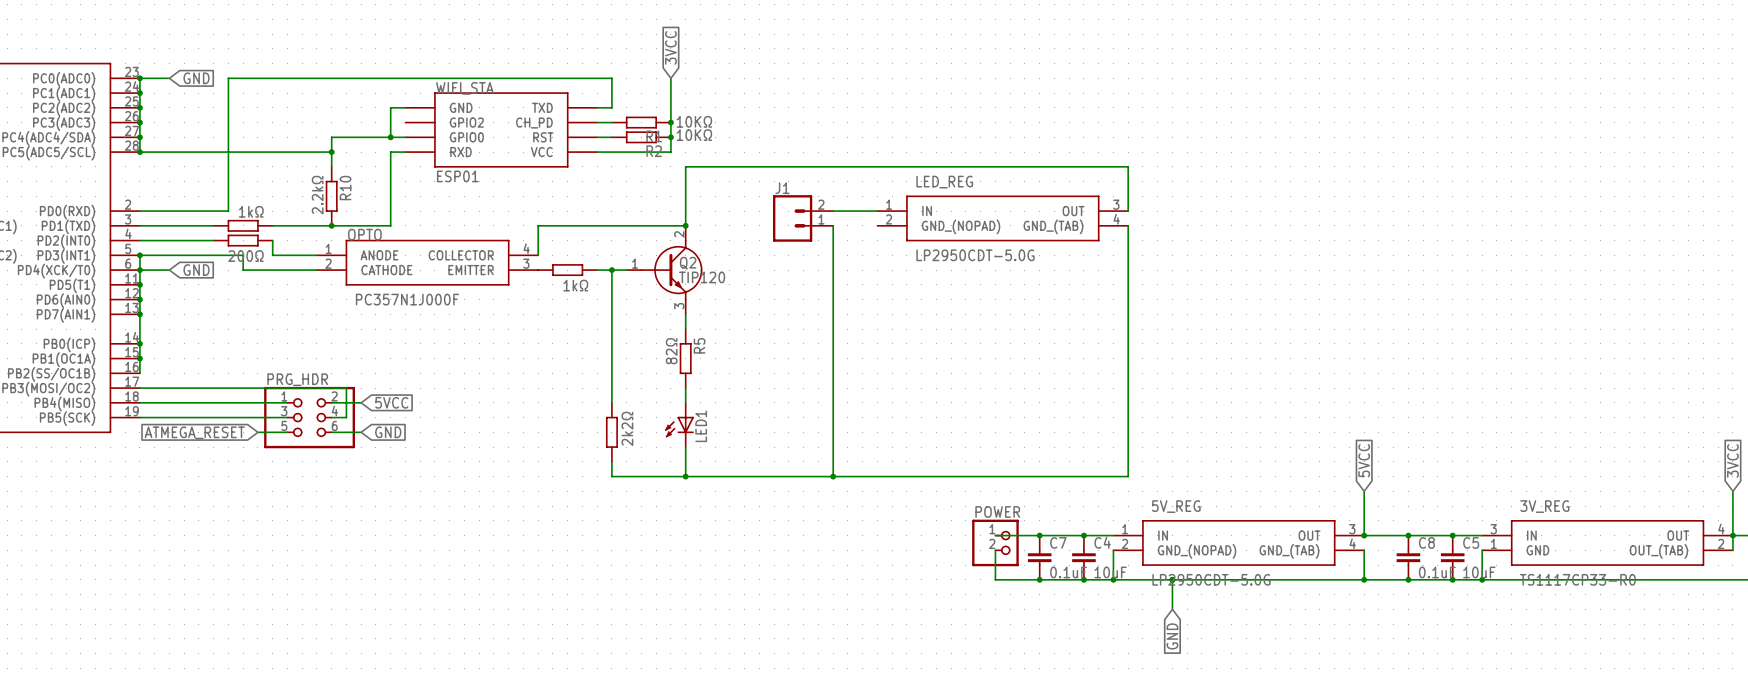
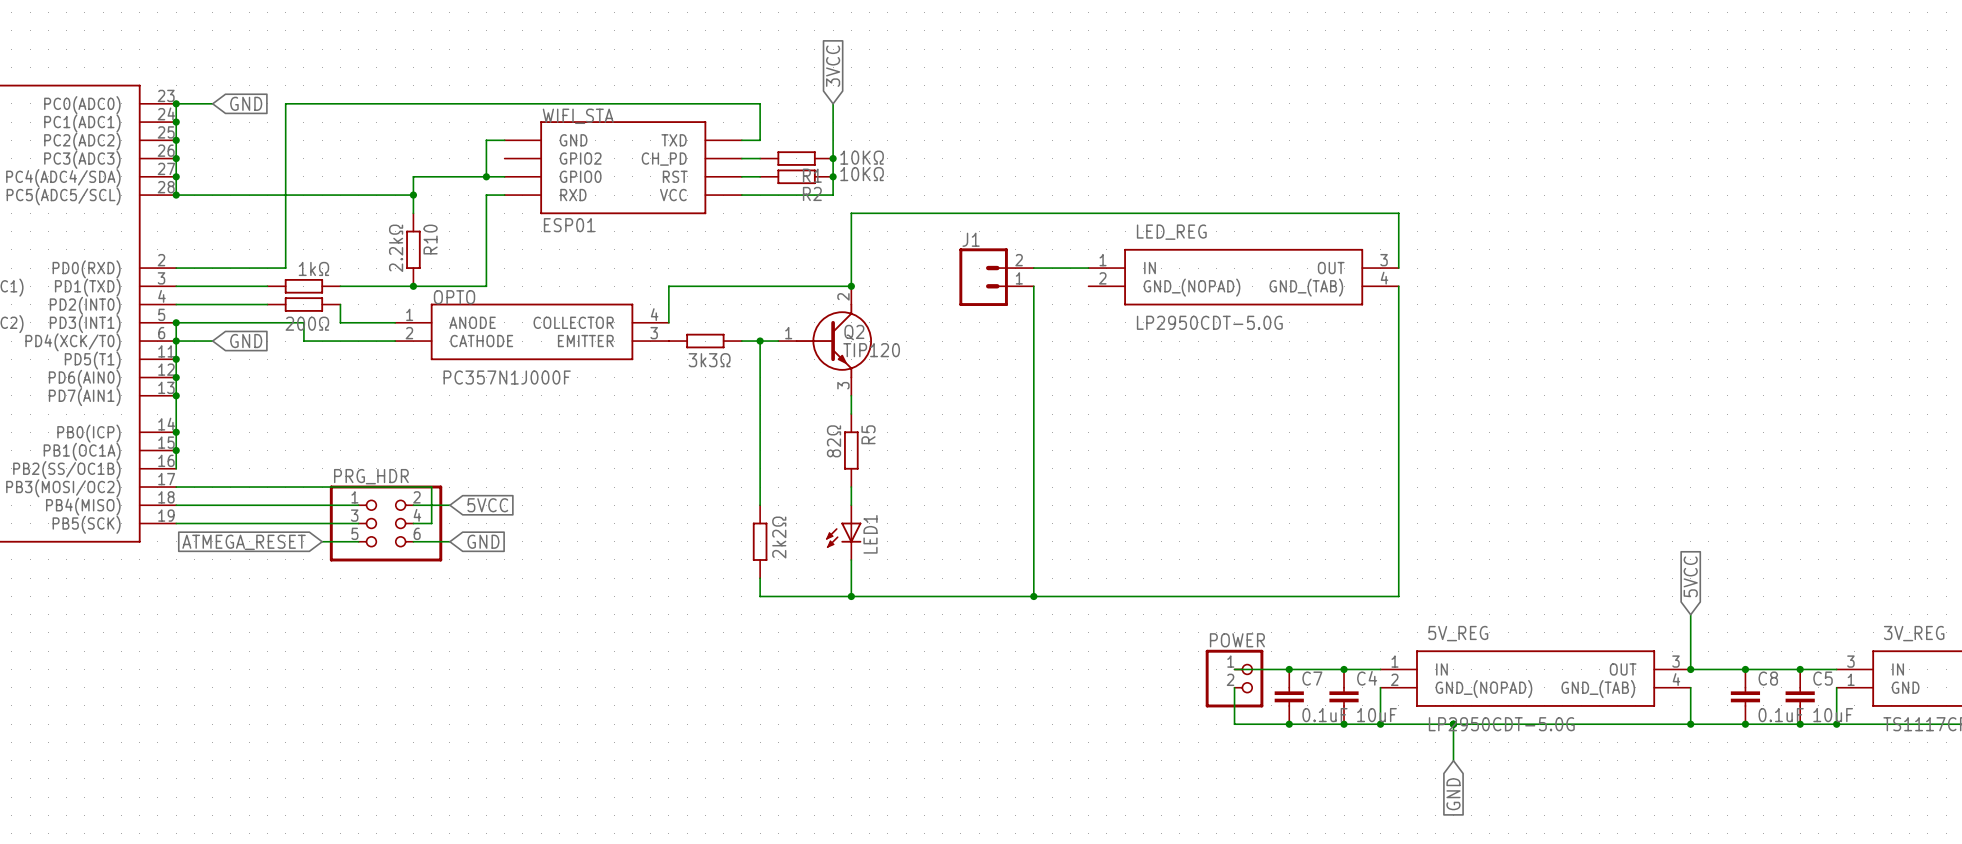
part value: 1kΩ (575, 285) -> 3k3Ω (709, 360)

